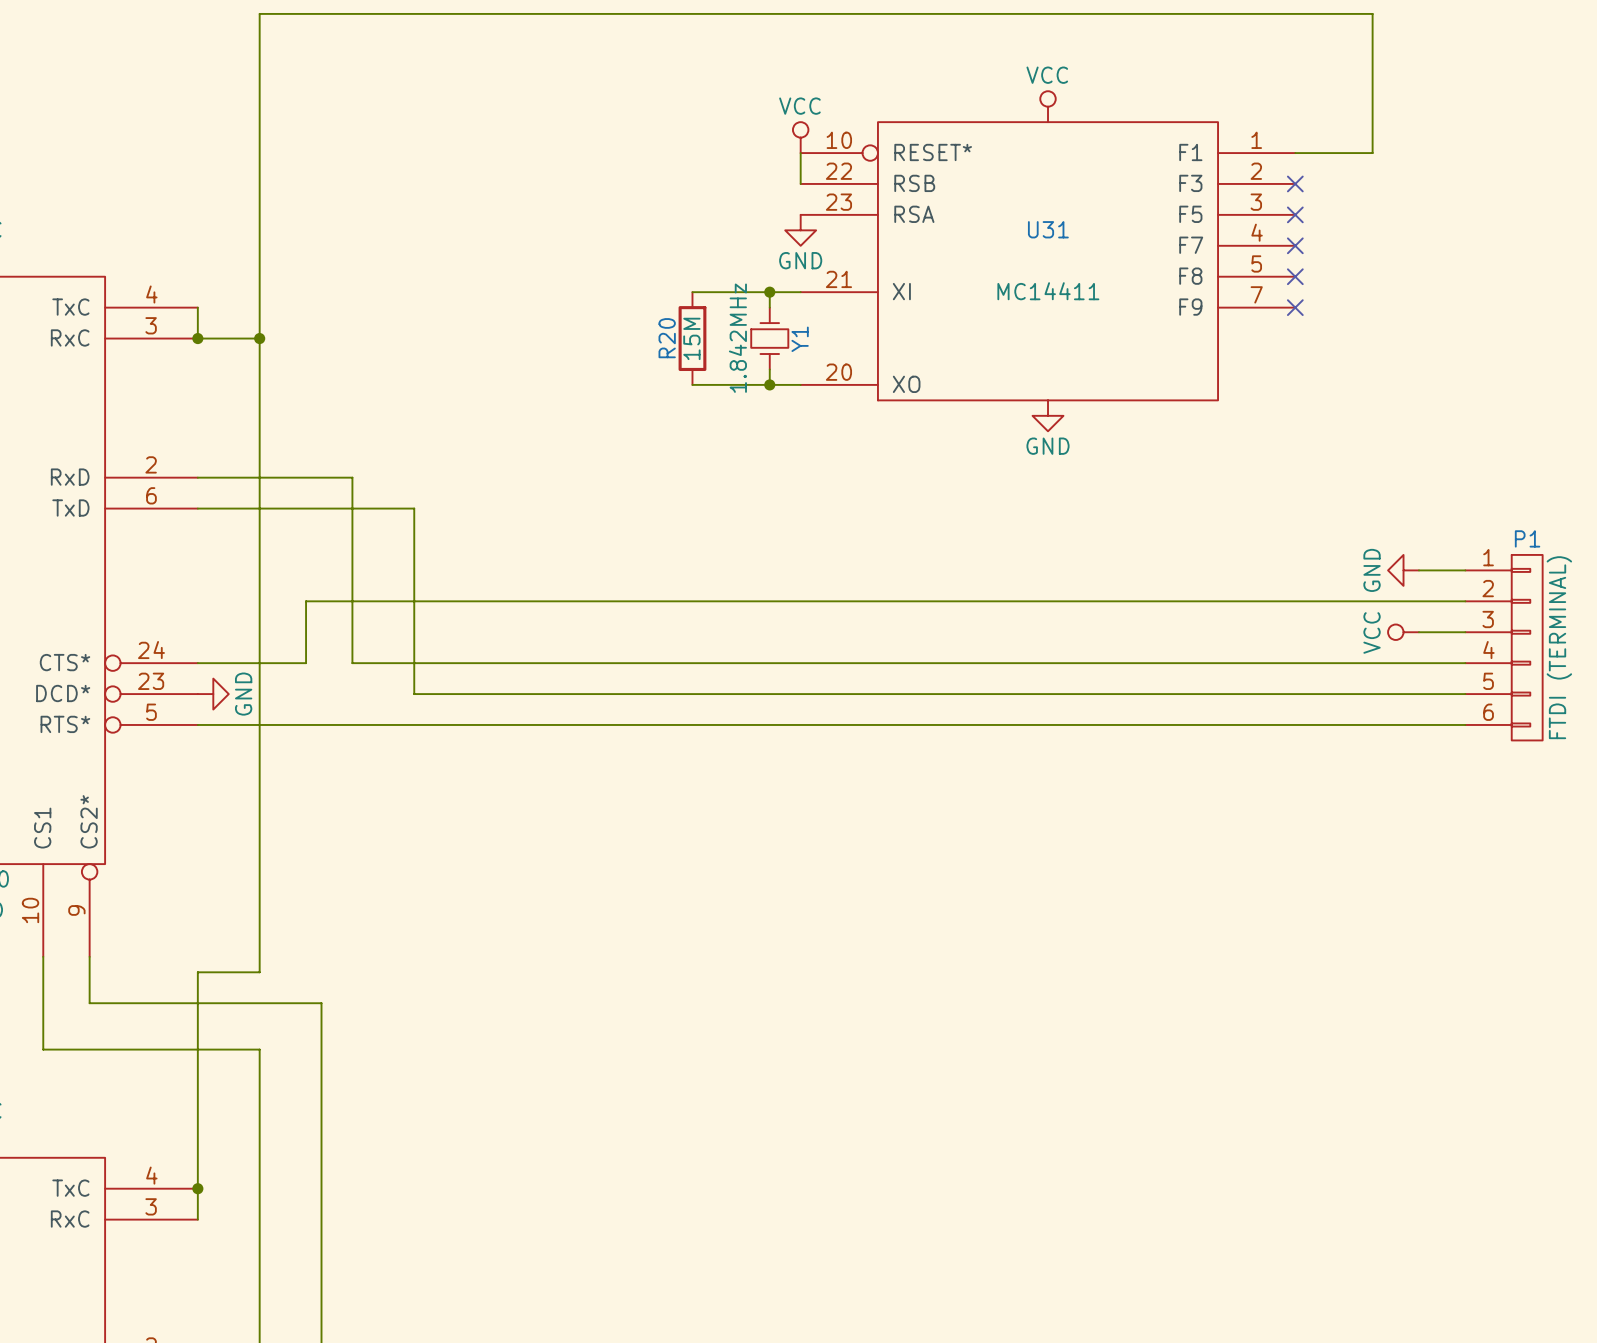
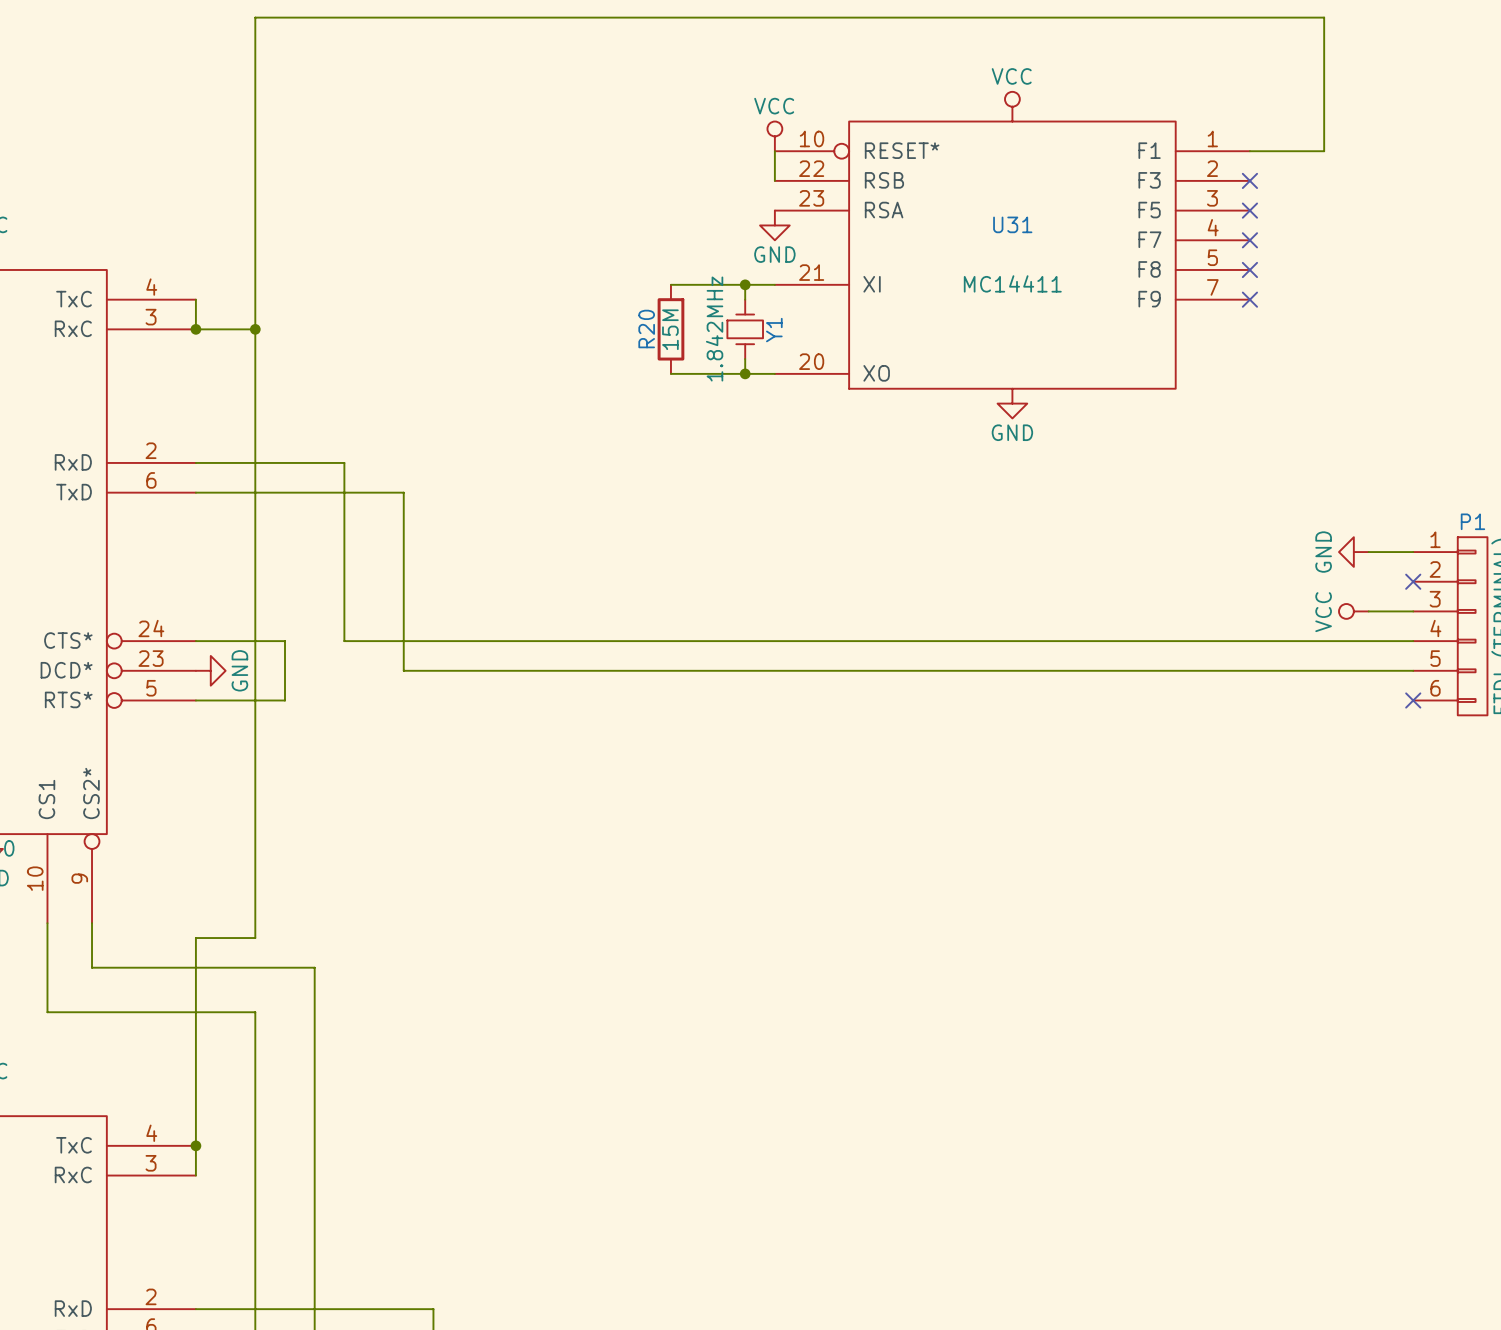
wire: (1465, 601) (306, 601) (306, 663) (290, 663) -> none
no-connect mark: none -> (1413, 581)
wire: (290, 724) (1465, 724) -> (285, 700) (285, 641)
no-connect mark: none -> (1413, 700)

